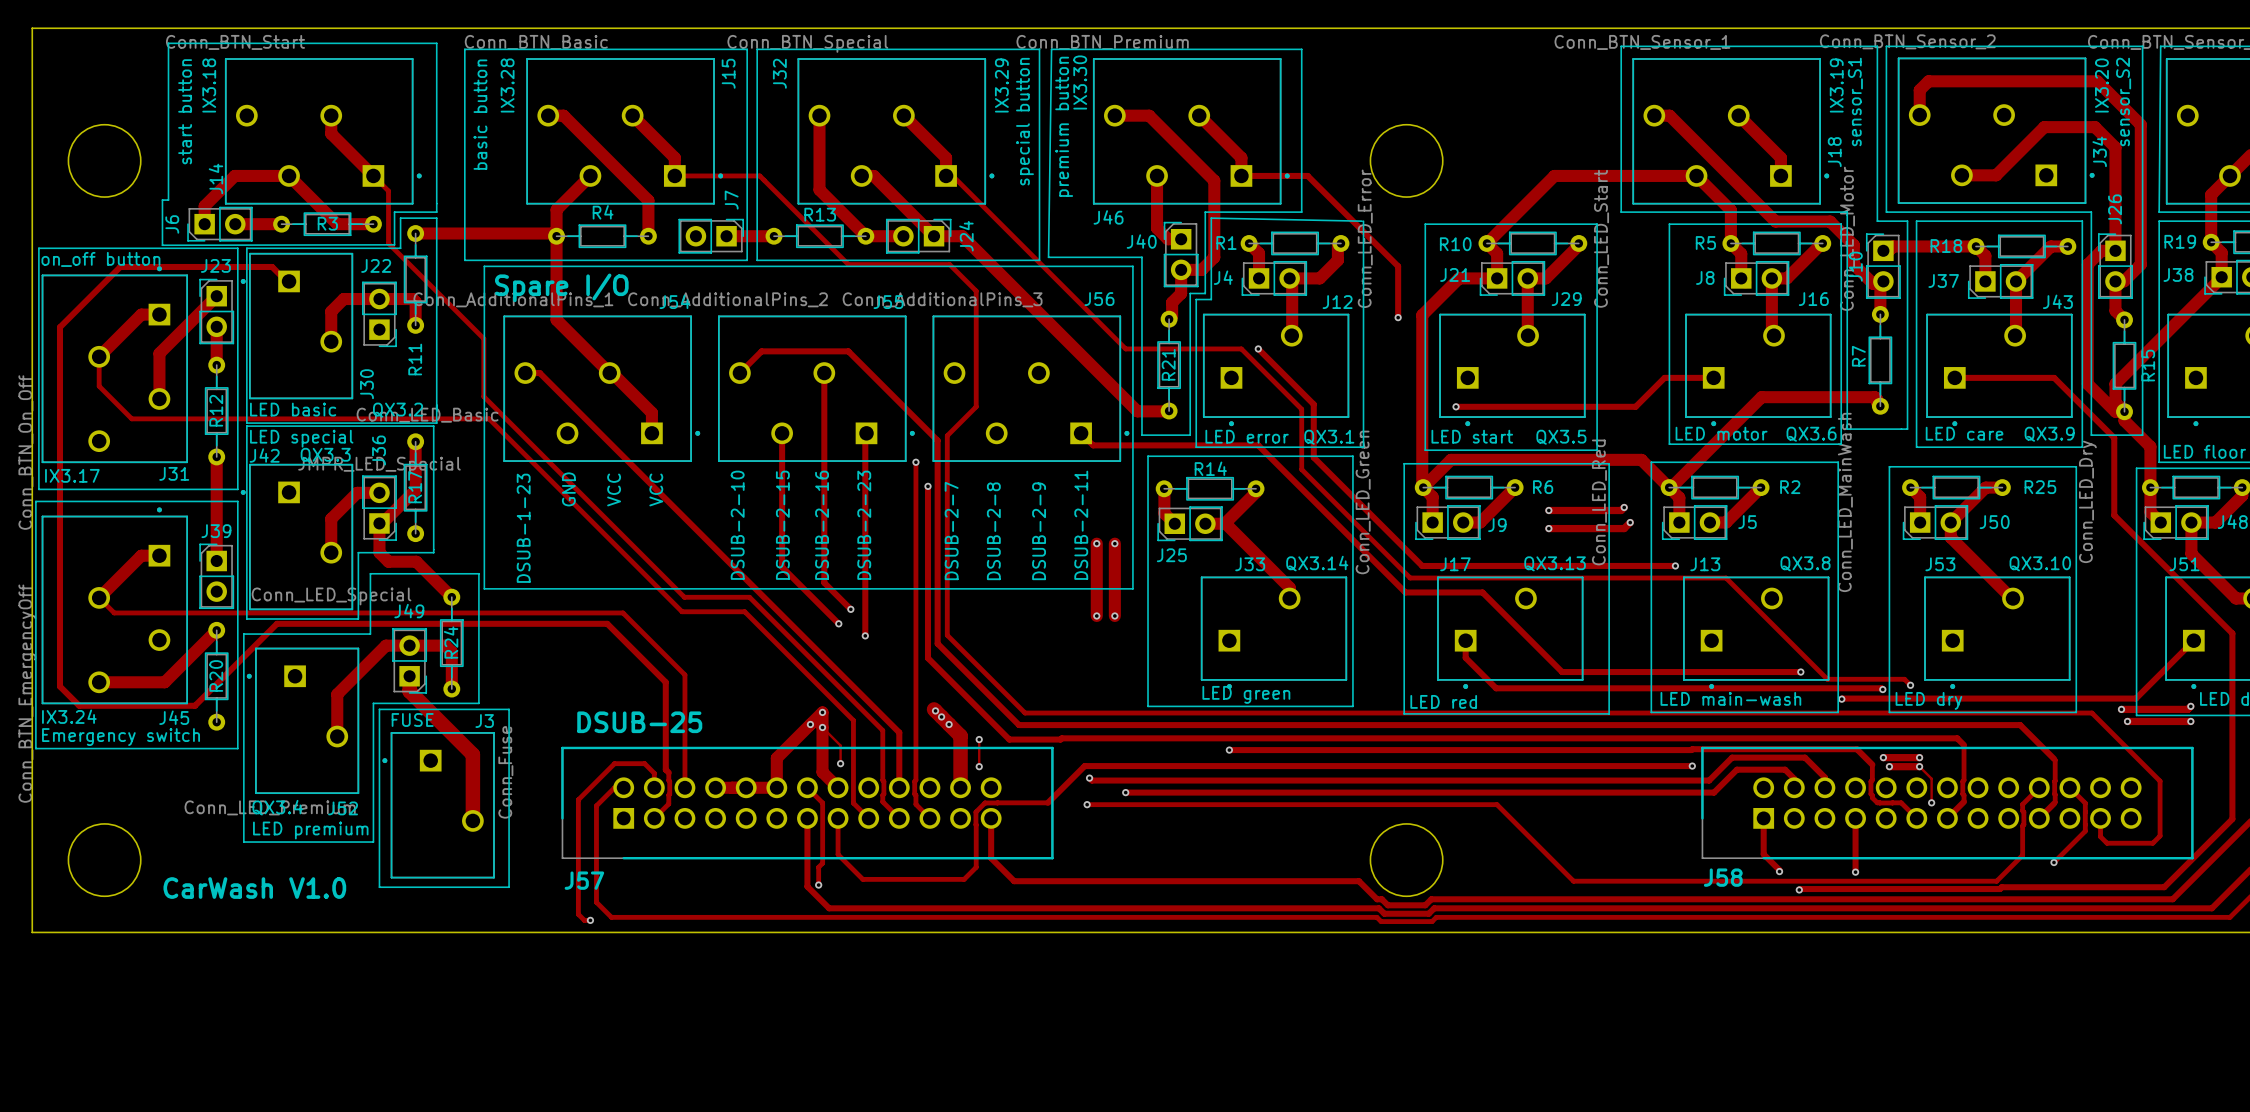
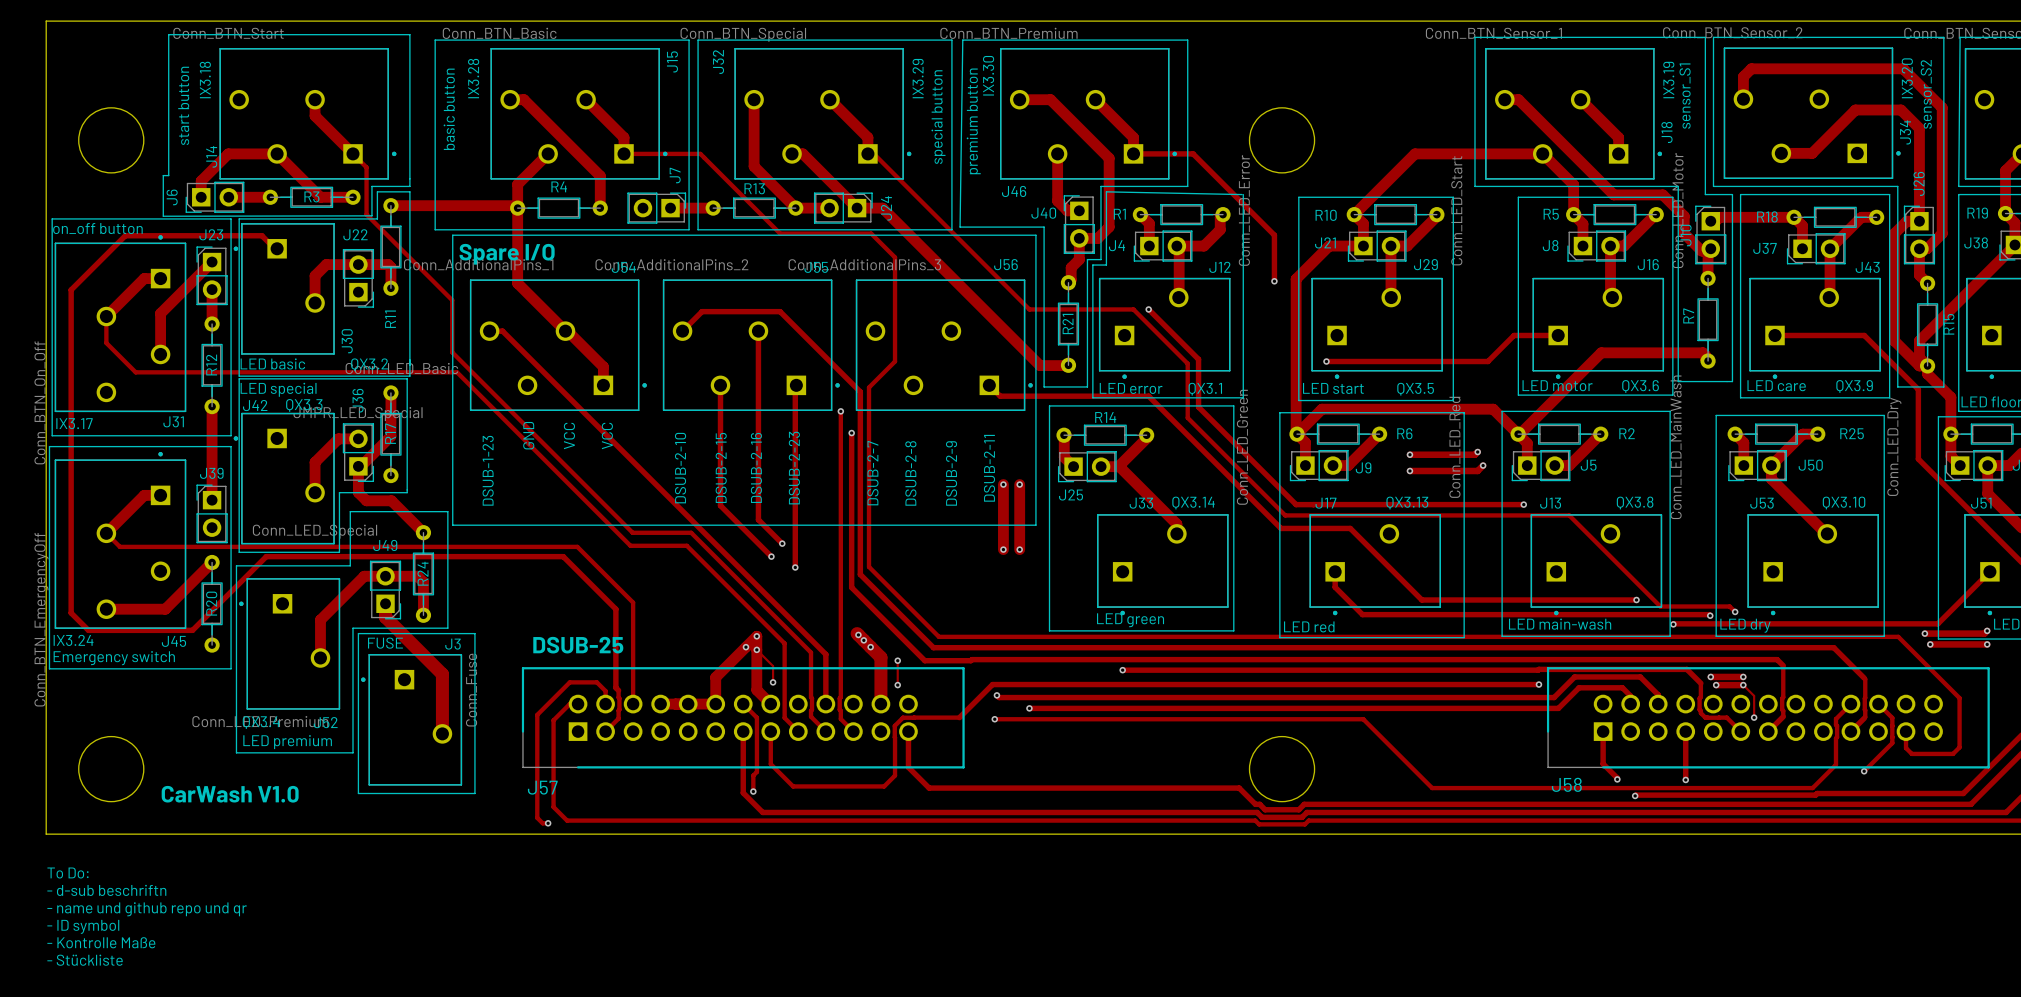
text: none -> To Do: (68, 873)
text: none -> - d-sub beschriftn (106, 890)
text: none -> - name und github repo und qr (147, 909)
text: none -> - ID symbol (83, 926)
text: none -> - Kontrolle Maße (101, 942)
text: none -> - Stückliste (85, 960)

